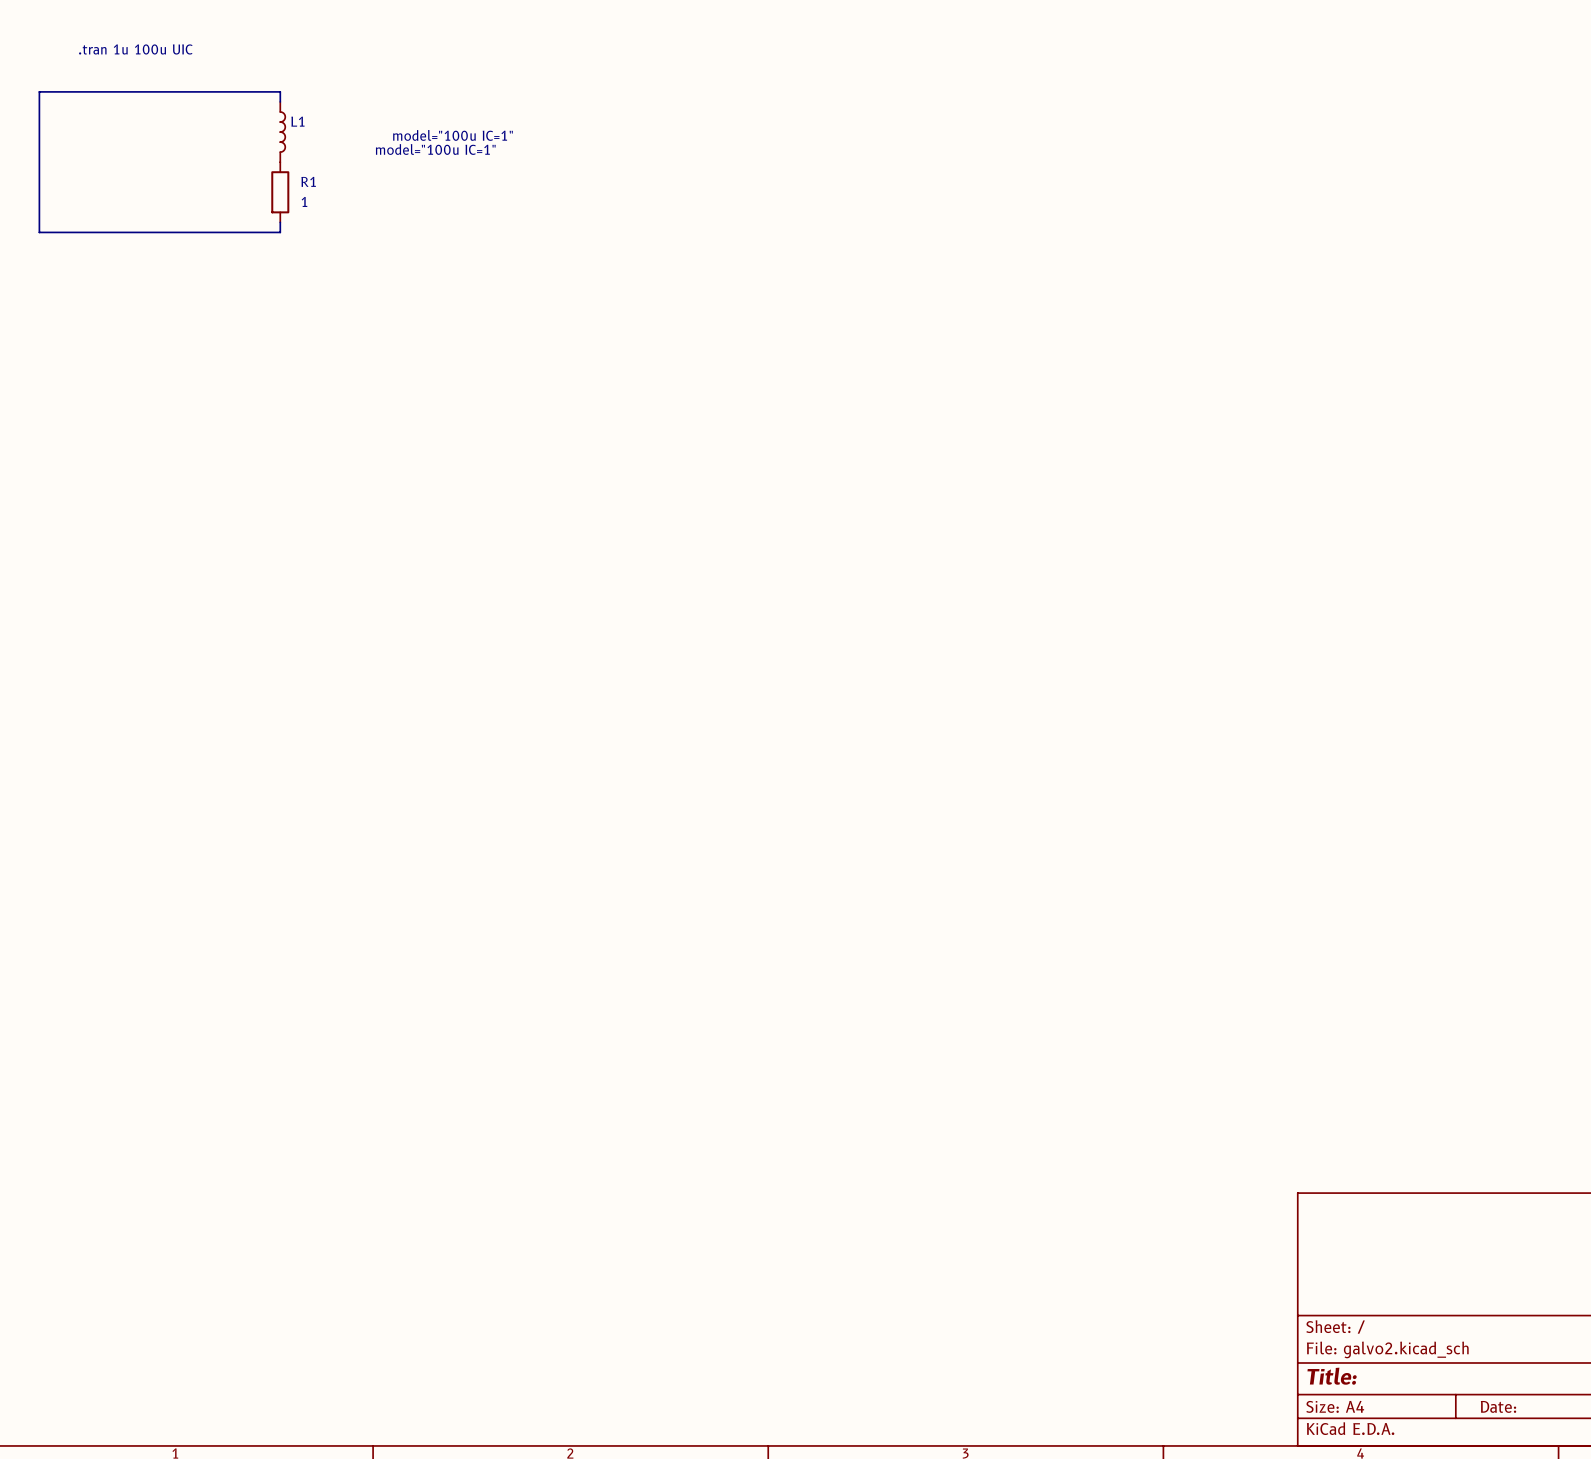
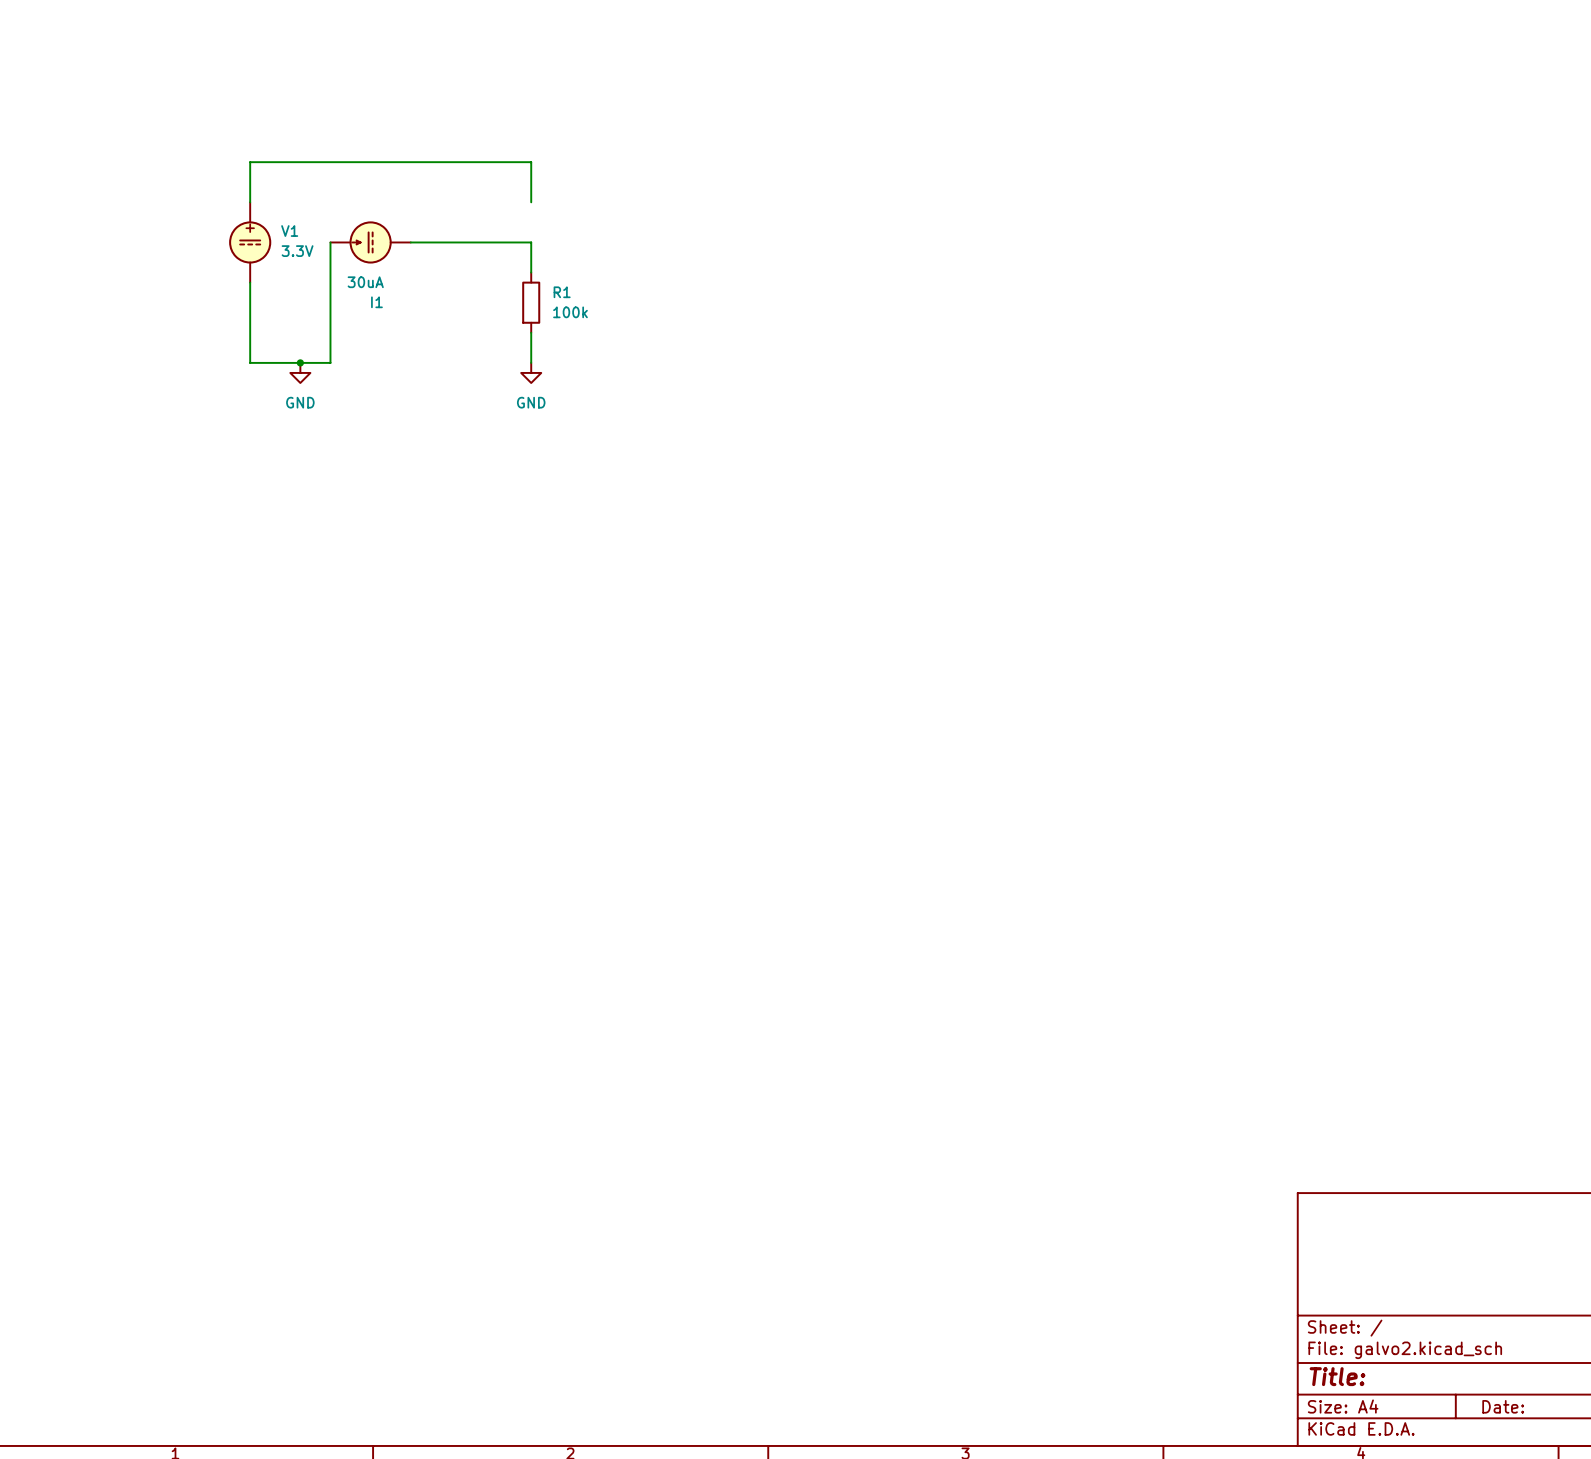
text: .tran 1u 100u UIC (135, 49) -> none
wire: (280, 101) (280, 91) (39, 91) (39, 232) (280, 232) (280, 222) -> none
L1: model="100u IC=1" (282, 132) -> none
R1 position: (280, 192) -> (531, 302)
R1 value: 1 (304, 201) -> 100k (570, 312)
wire: none -> (250, 202) (250, 162) (531, 162) (531, 202)
V1: none -> 3.3V (250, 242)
wire: none -> (330, 242) (330, 362) (250, 362) (250, 282)
I1: none -> 30uA (370, 242)
wire: none -> (410, 242) (531, 242) (531, 272)
wire: none -> (531, 332) (531, 362)
junction: none -> (300, 362)
power symbol: none -> GND (300, 372)
power symbol: none -> GND (531, 372)

